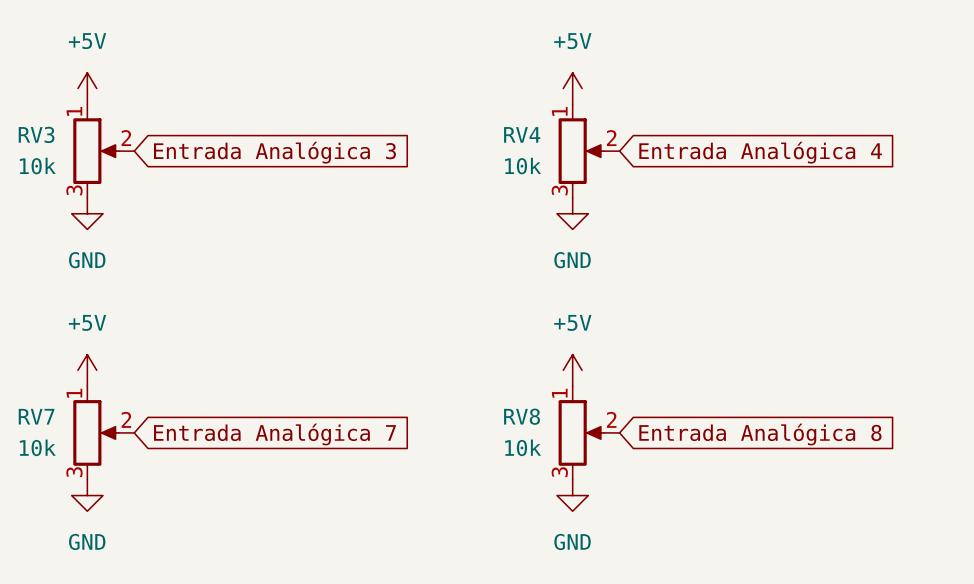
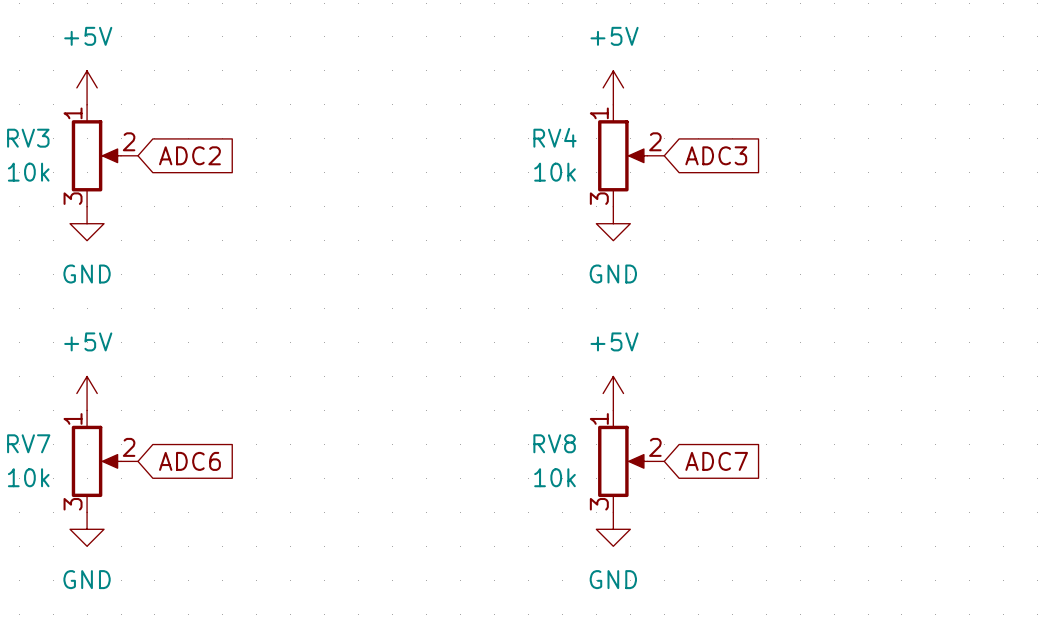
global label: Entrada Analógica 3 (274, 152) -> ADC2 (189, 155)
global label: Entrada Analógica 4 (760, 152) -> ADC3 (716, 155)
global label: Entrada Analógica 7 (274, 434) -> ADC6 (189, 461)
global label: Entrada Analógica 8 (760, 434) -> ADC7 (716, 461)

